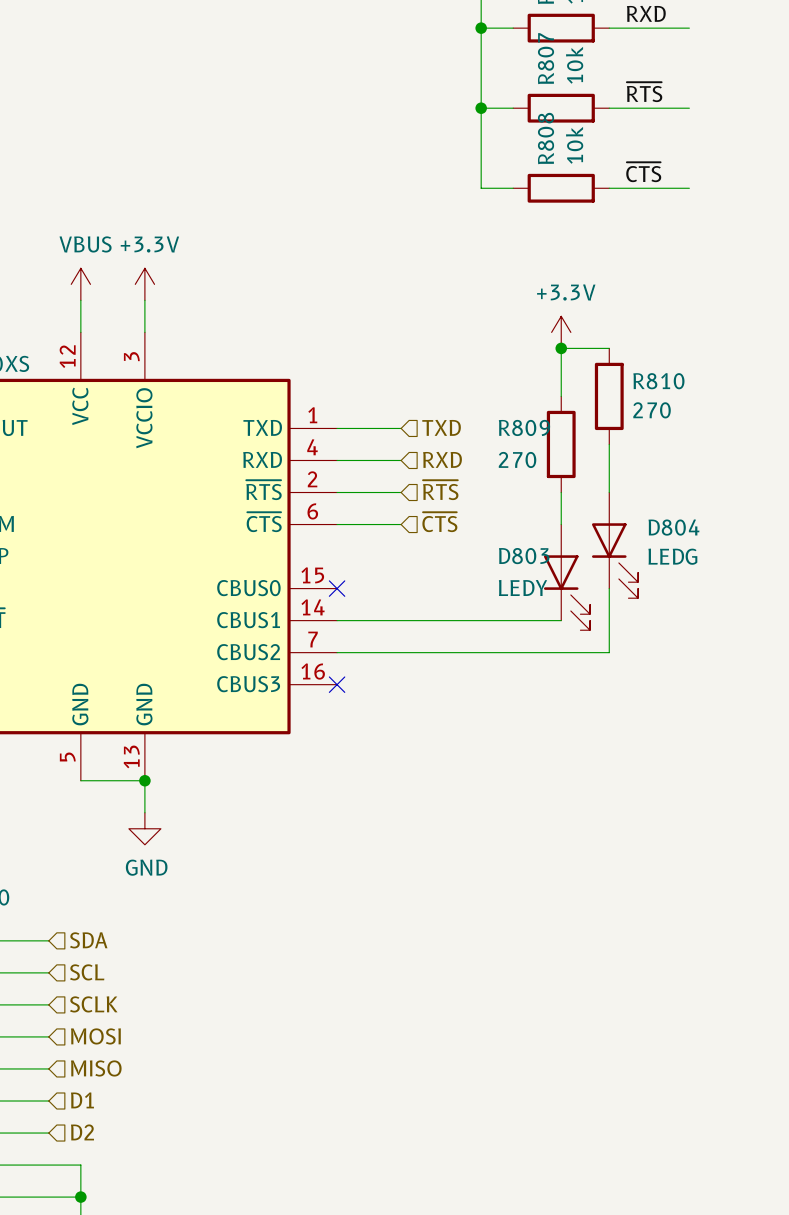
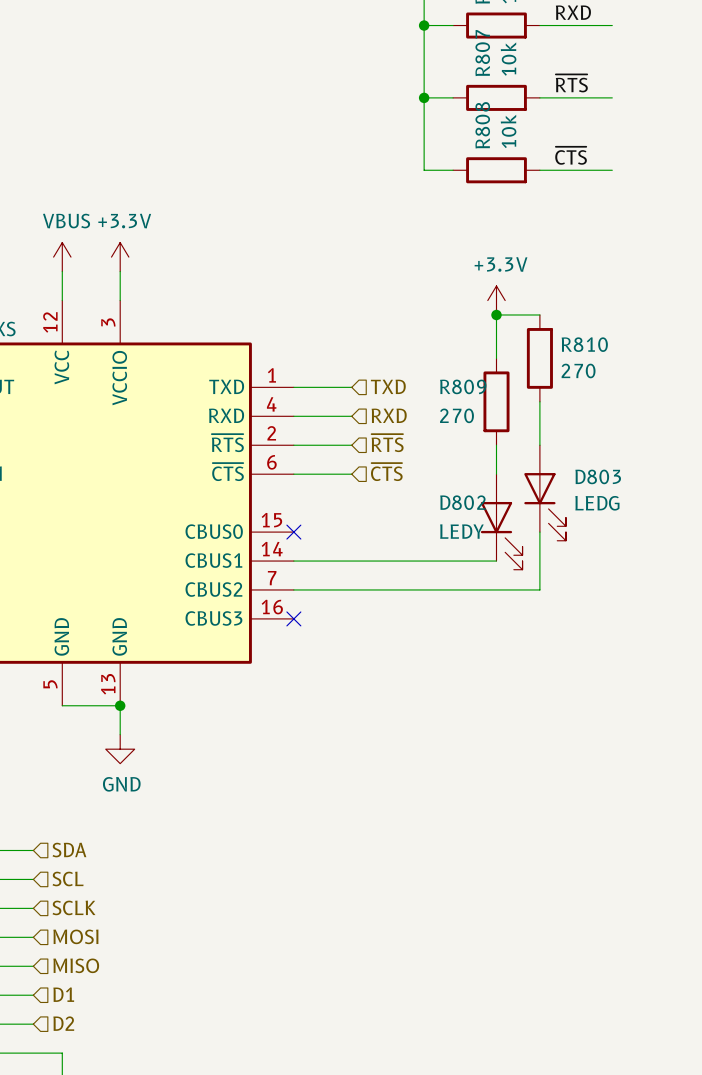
D804 name: D804 (673, 527) -> D803 (598, 476)
D803 name: D803 (524, 556) -> D802 (463, 502)

